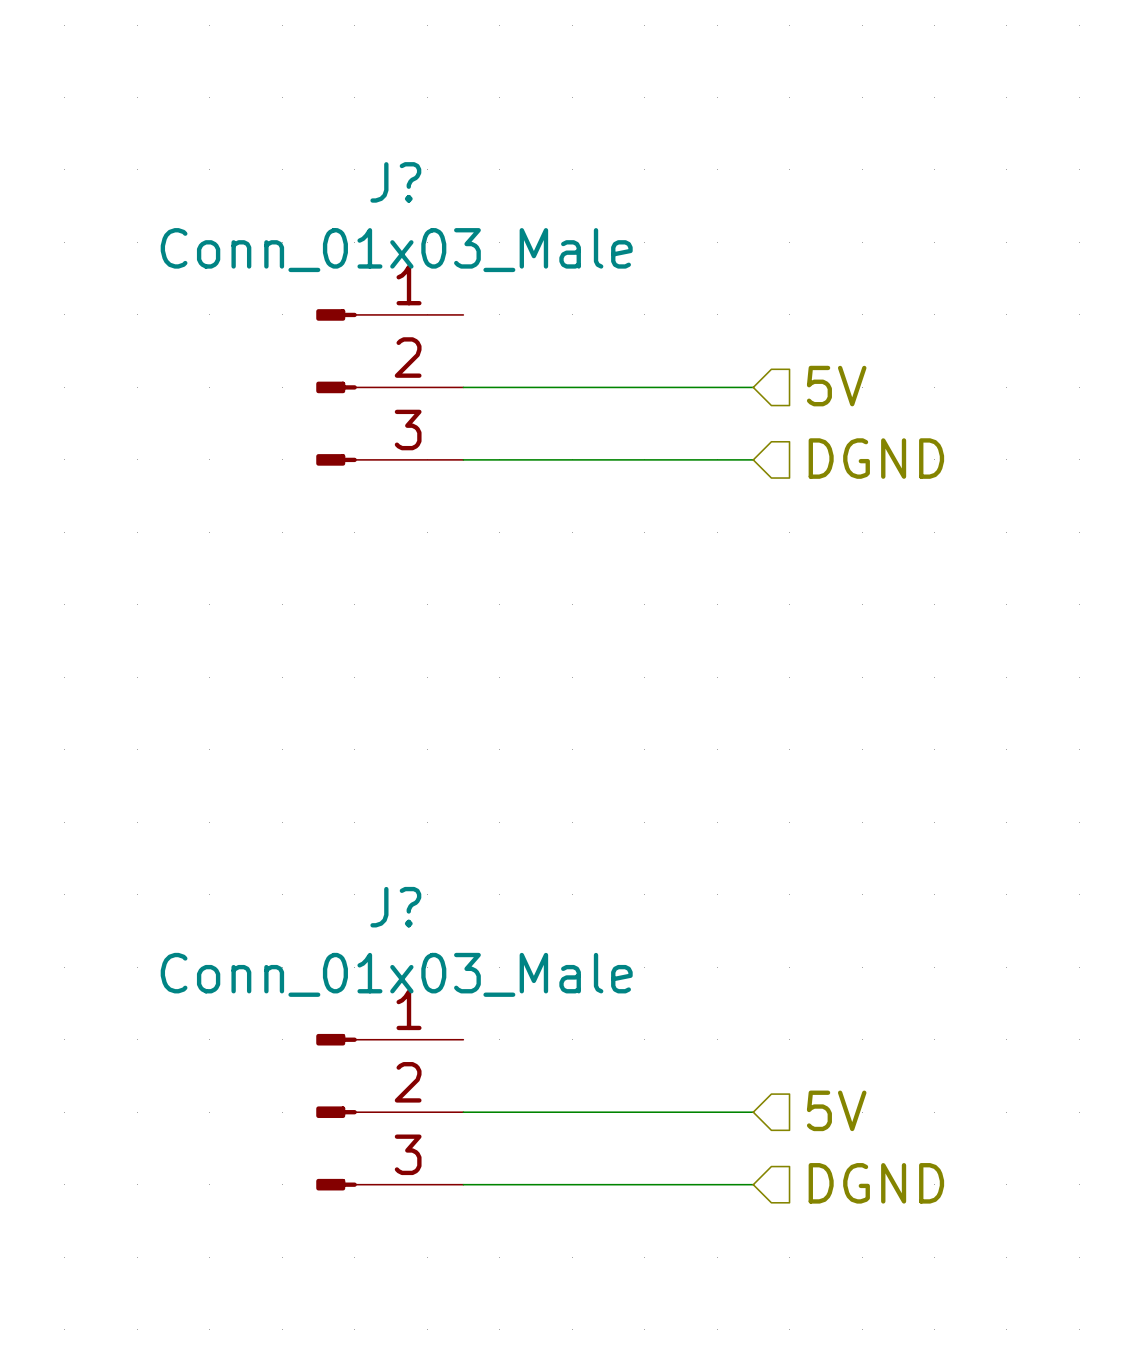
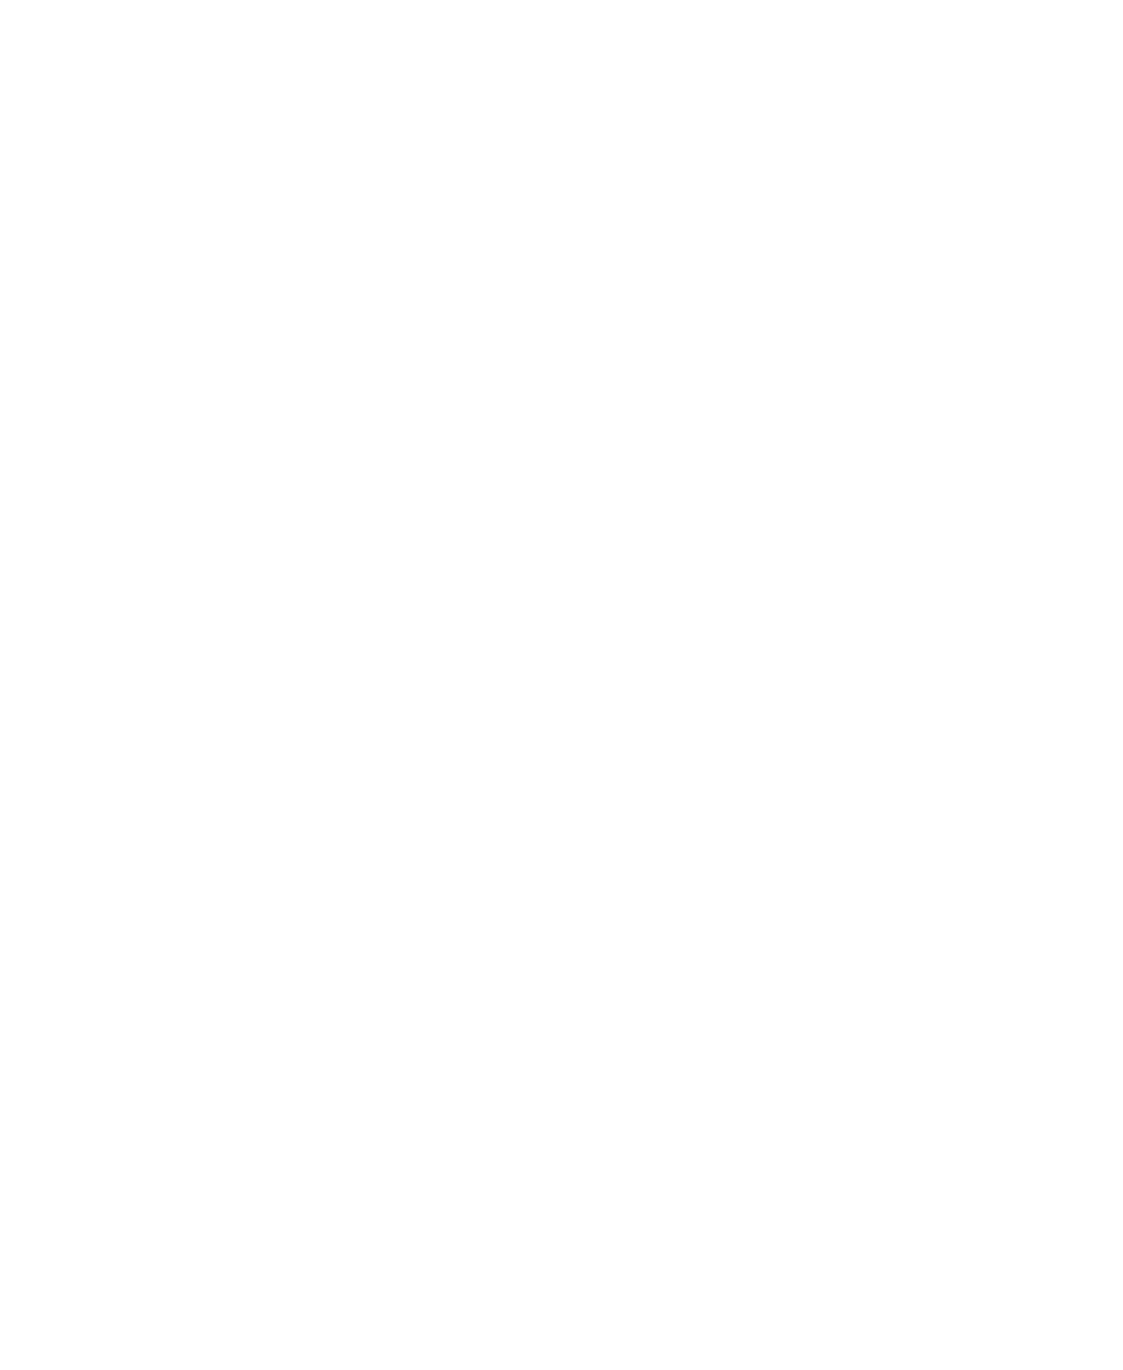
hierarchical label: 5V (836, 386) -> none
J?: Conn_01x03_Male (389, 387) -> none
wire: (463, 387) (753, 387) -> none
hierarchical label: DGND (876, 458) -> none
wire: (463, 459) (753, 459) -> none
hierarchical label: 5V (836, 1110) -> none
J?: Conn_01x03_Male (389, 1112) -> none
wire: (463, 1112) (753, 1112) -> none
hierarchical label: DGND (876, 1183) -> none
wire: (463, 1184) (753, 1184) -> none

